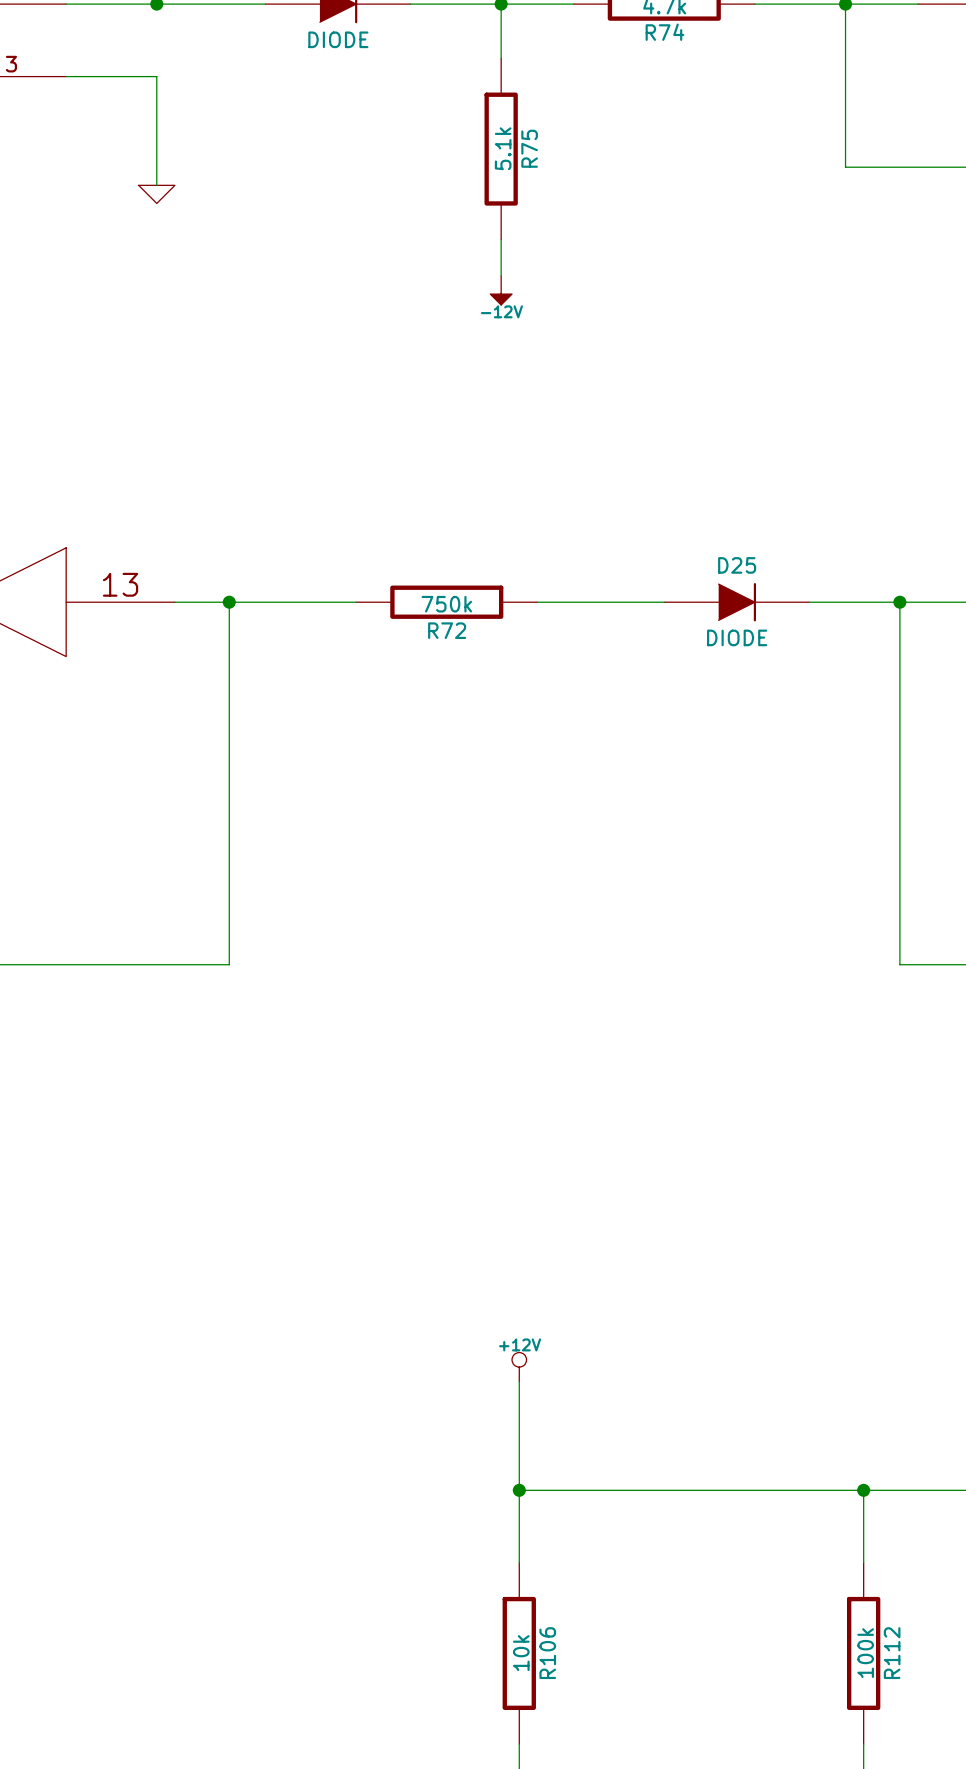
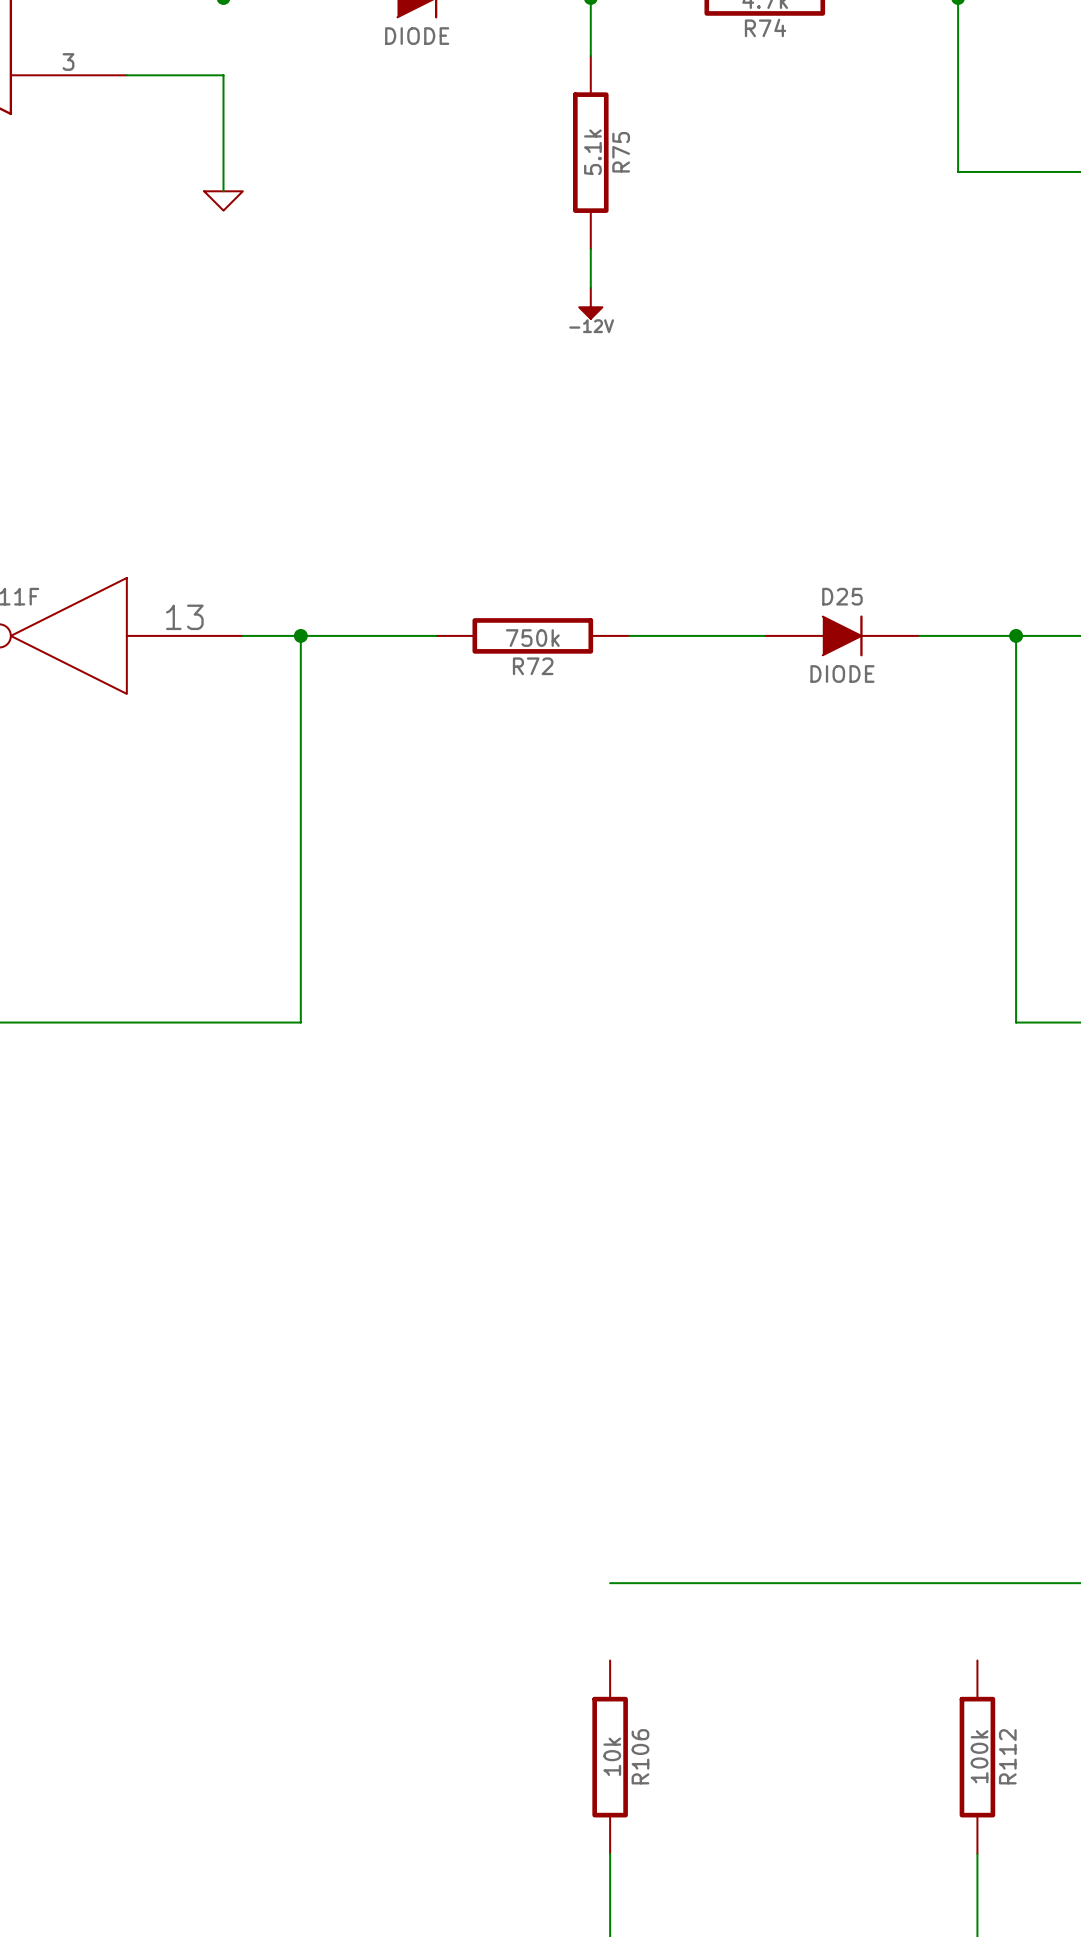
power symbol: +12V (519, 1367) -> none
wire: (519, 1381) (519, 1562) -> none
junction: (519, 1490) -> none
wire: (863, 1490) (863, 1562) -> none
junction: (863, 1490) -> none

